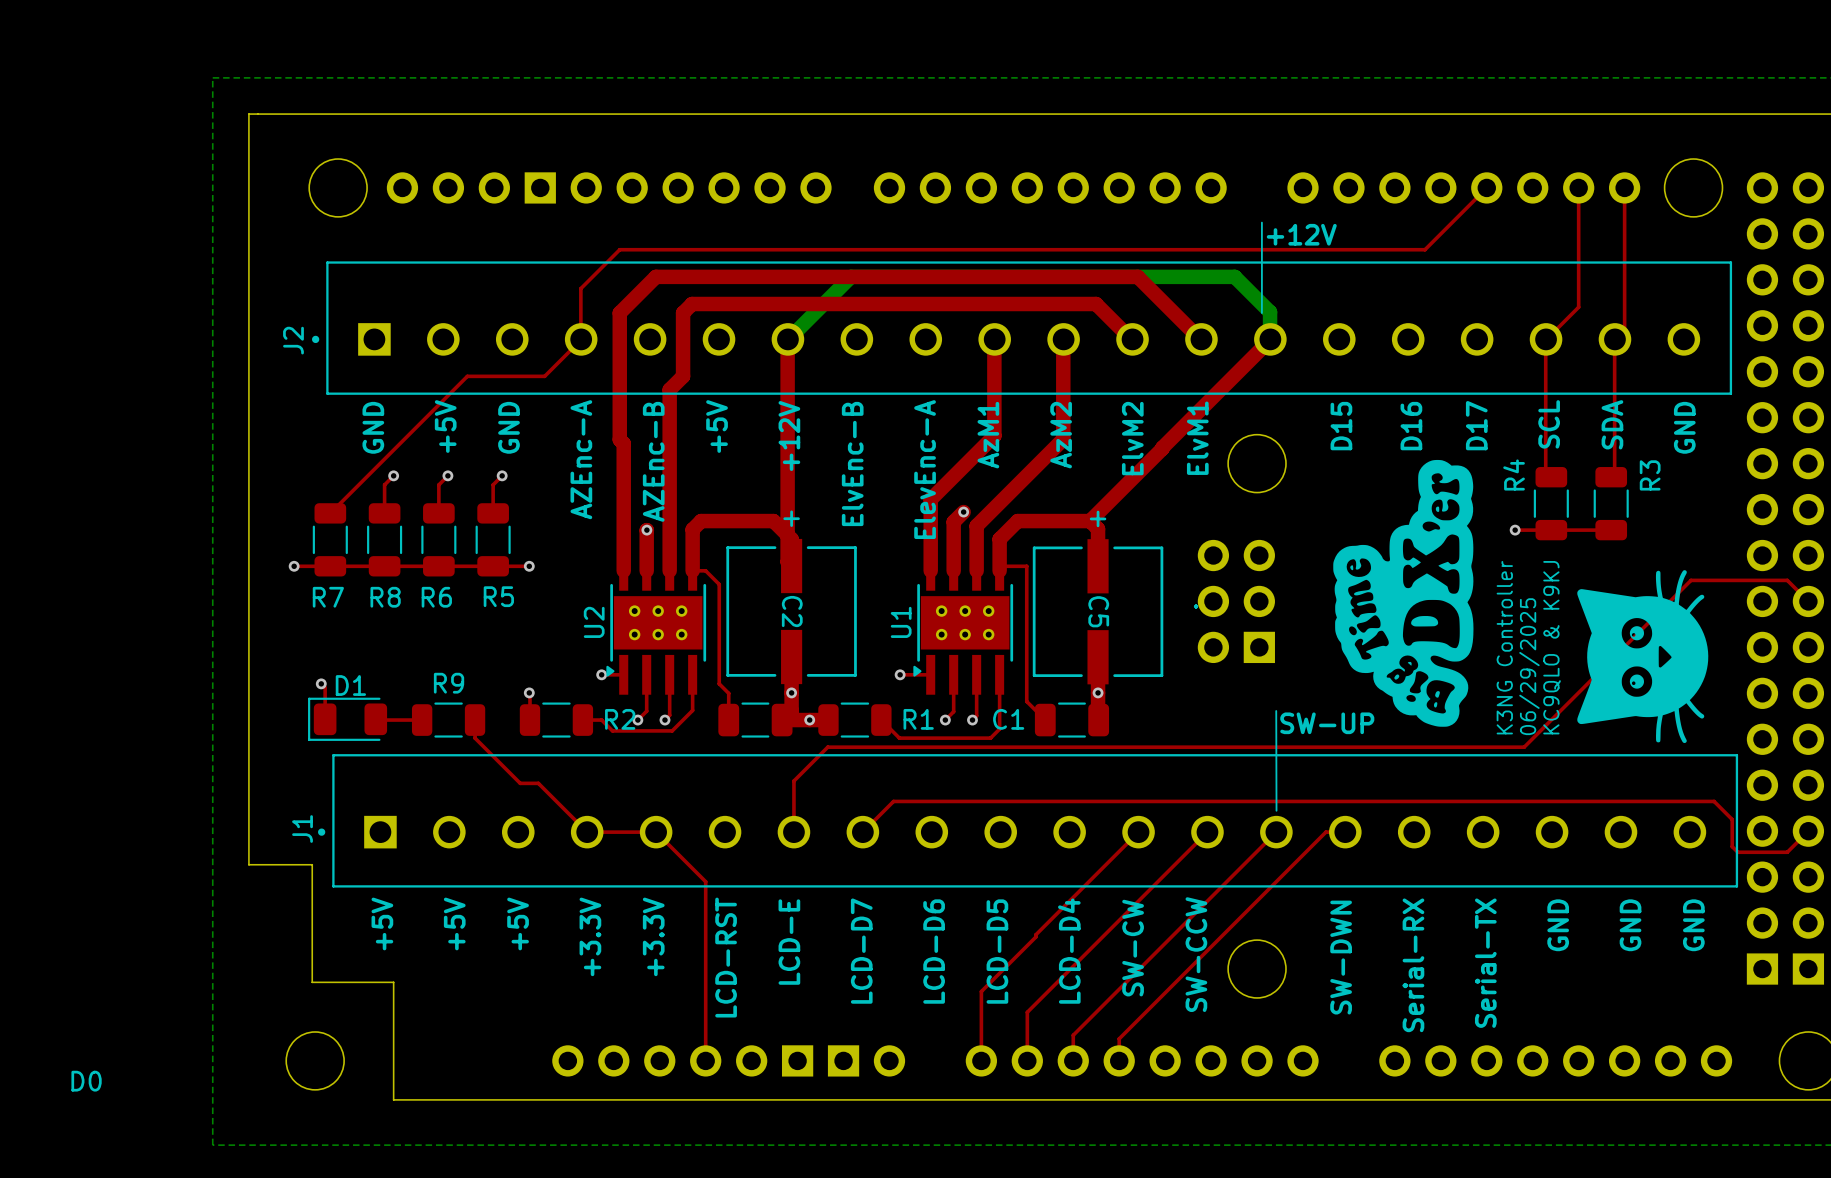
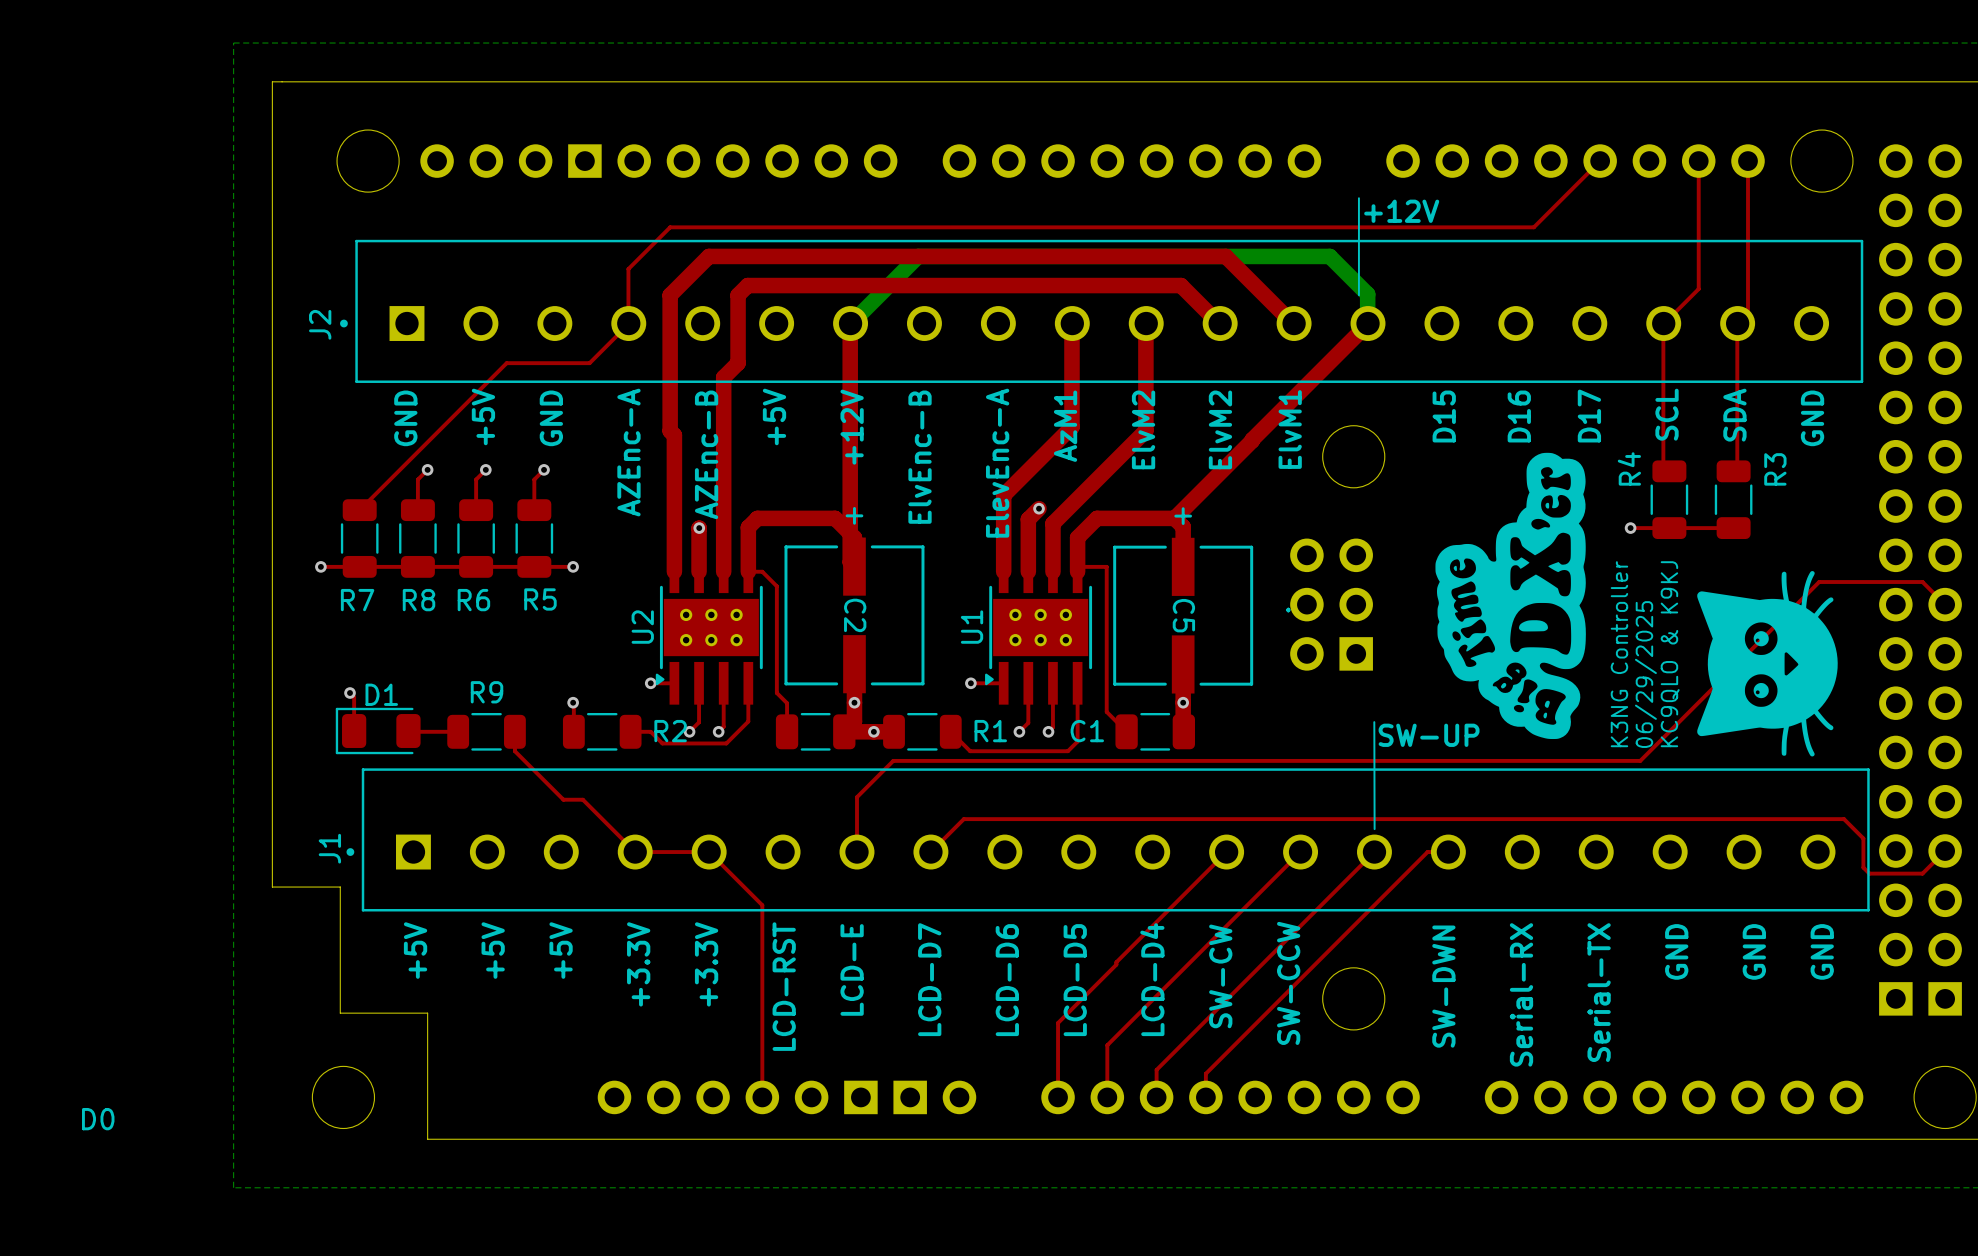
text: AzM2 (1061, 435) -> ElvM2 (1143, 429)

